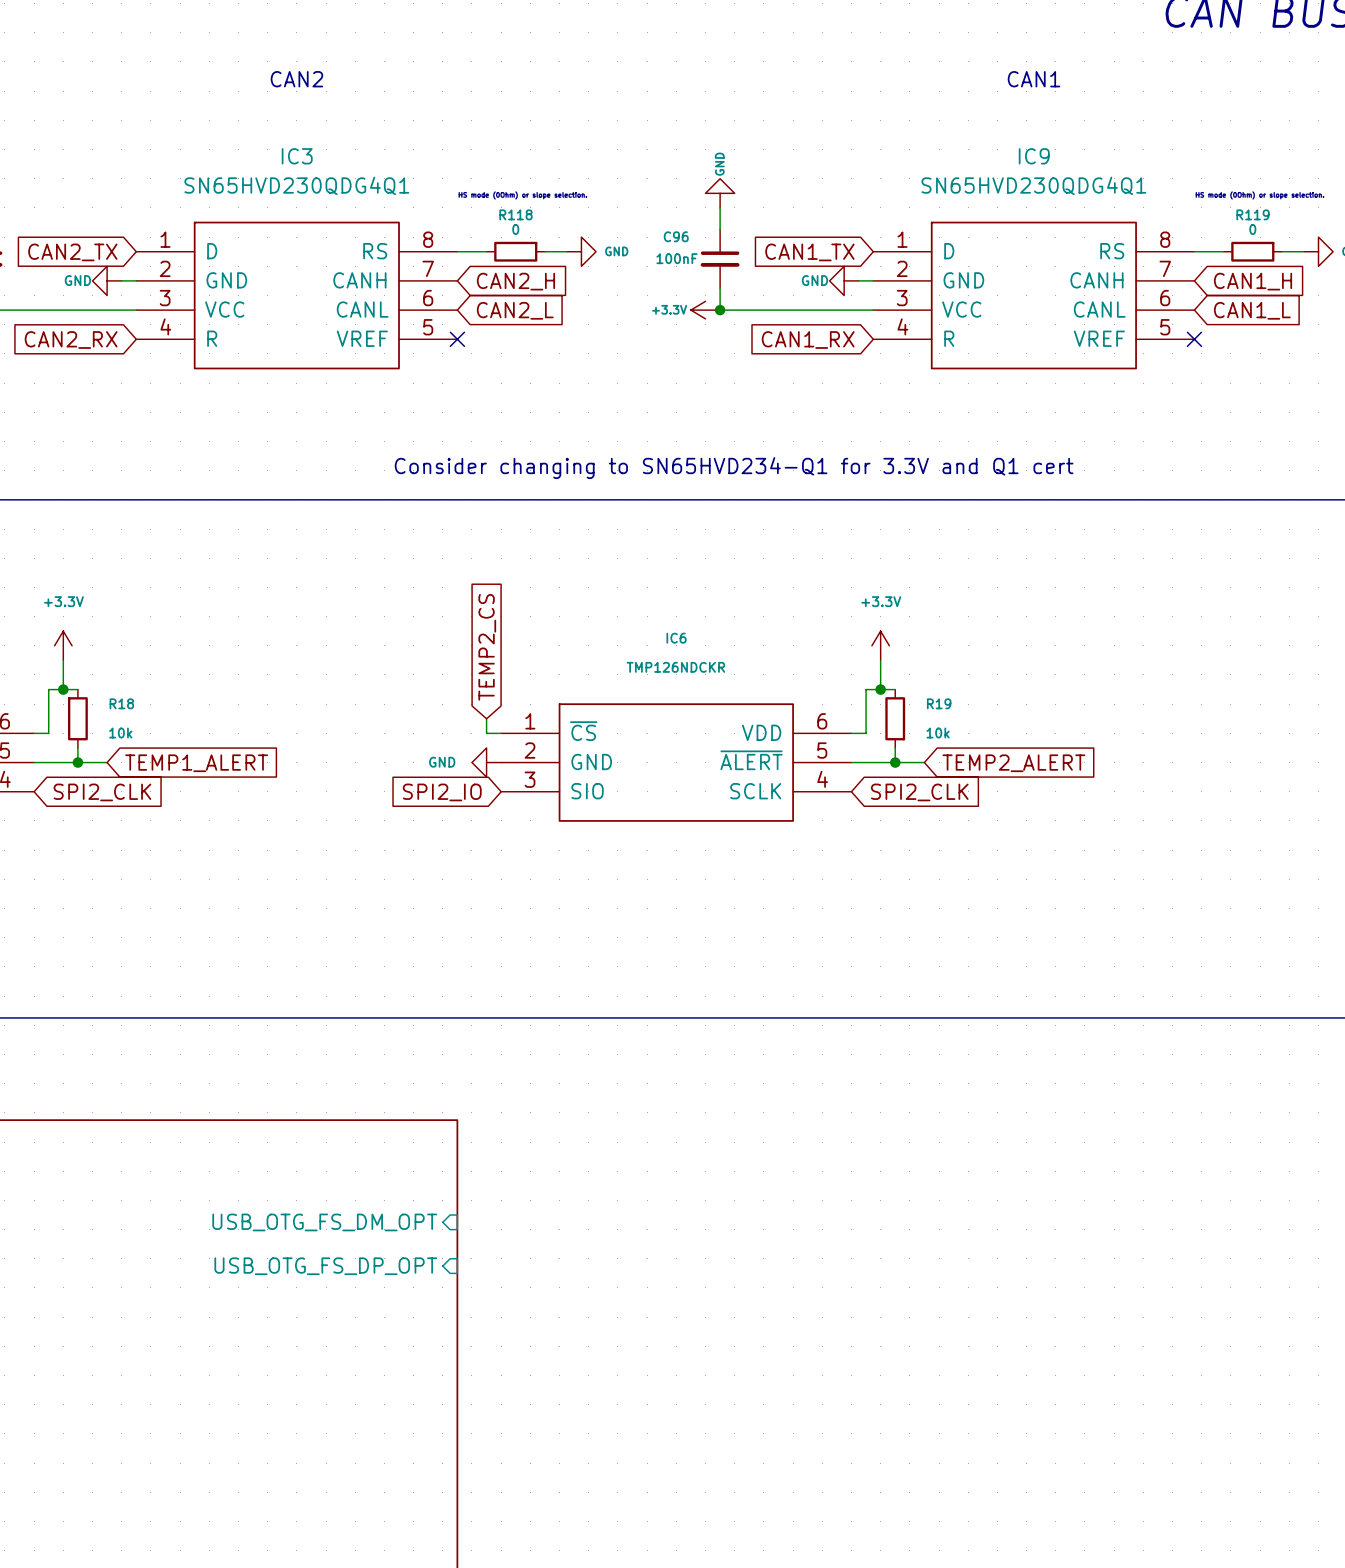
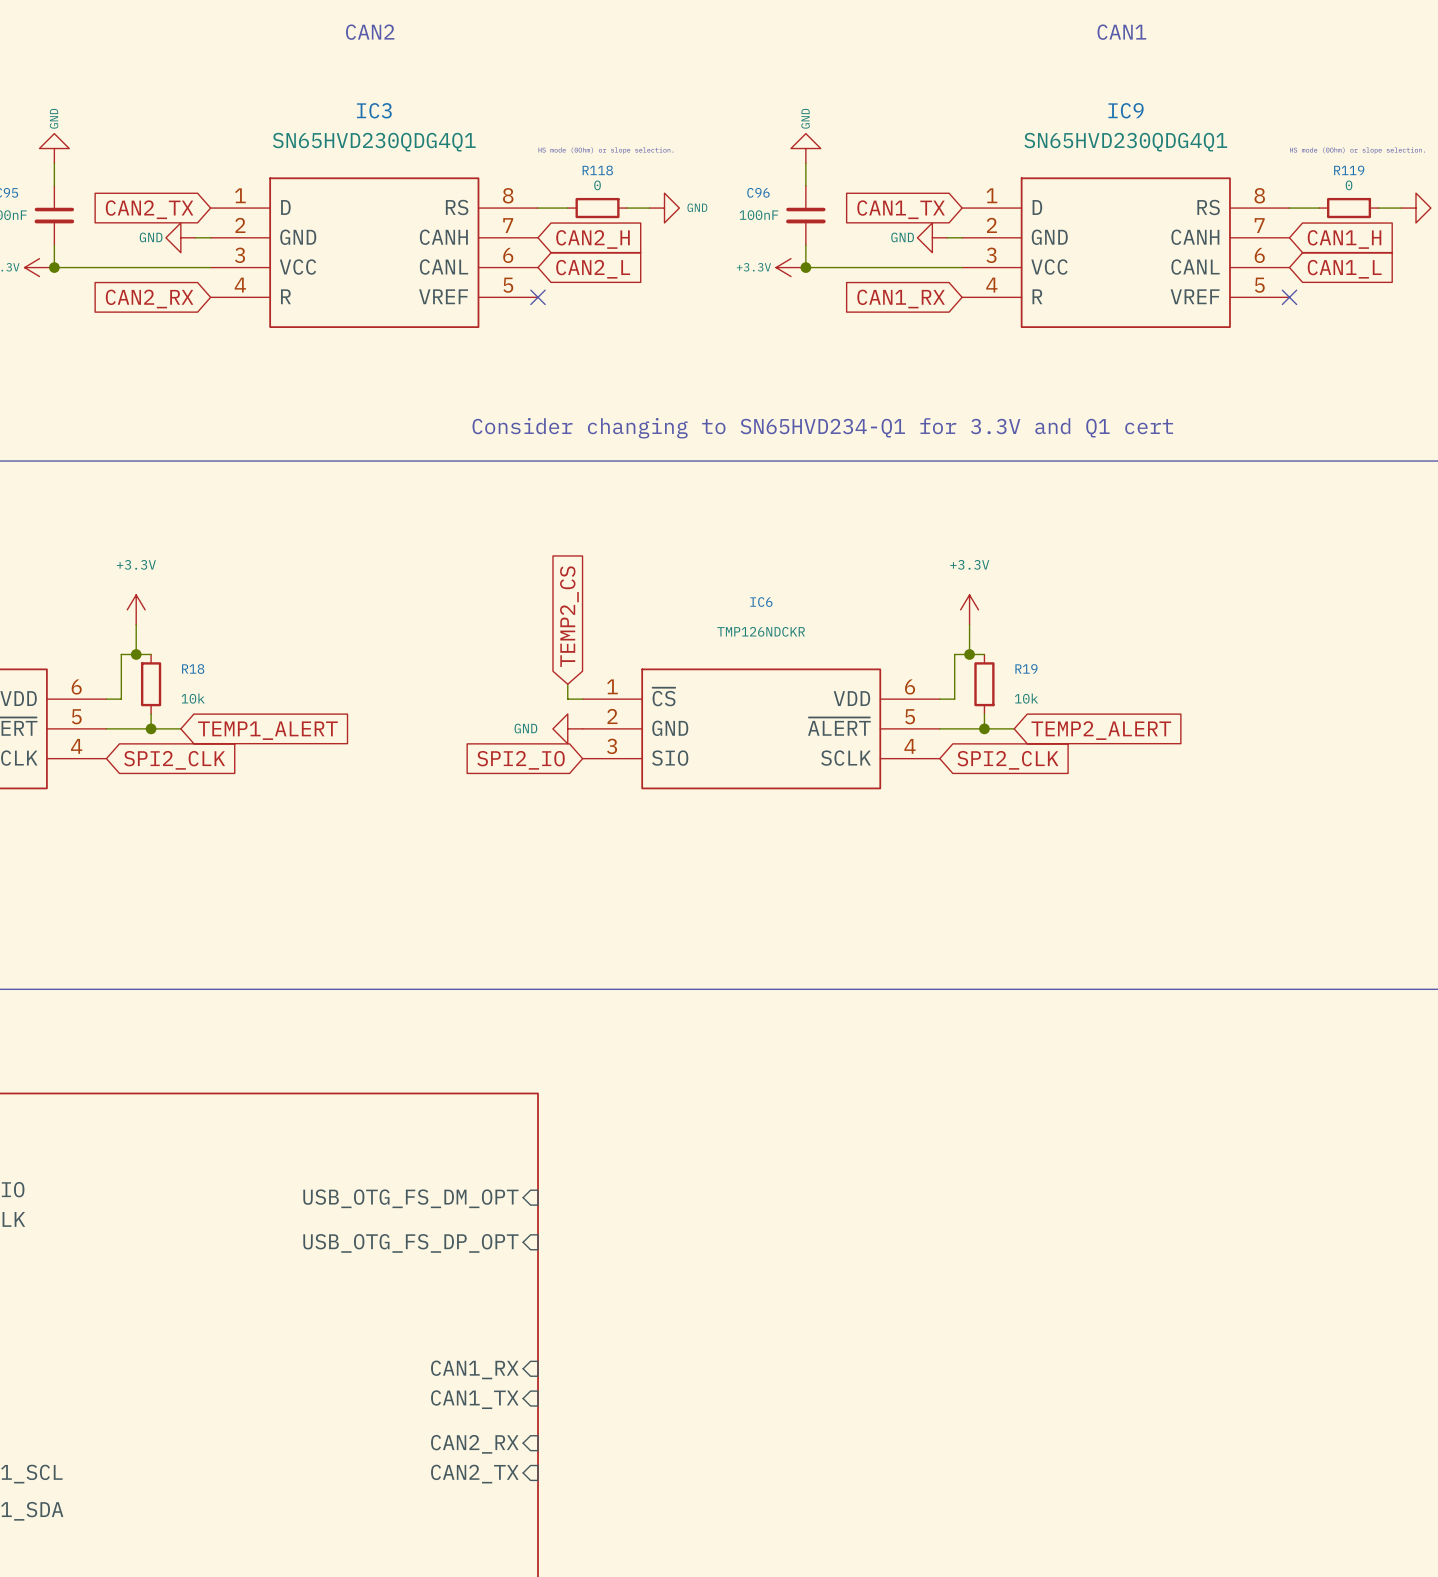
sheet pin: none -> CAN1_RX (474, 1369)
sheet pin: none -> CAN1_TX (474, 1399)
sheet pin: none -> CAN2_RX (474, 1444)
sheet pin: none -> CAN2_TX (474, 1474)

